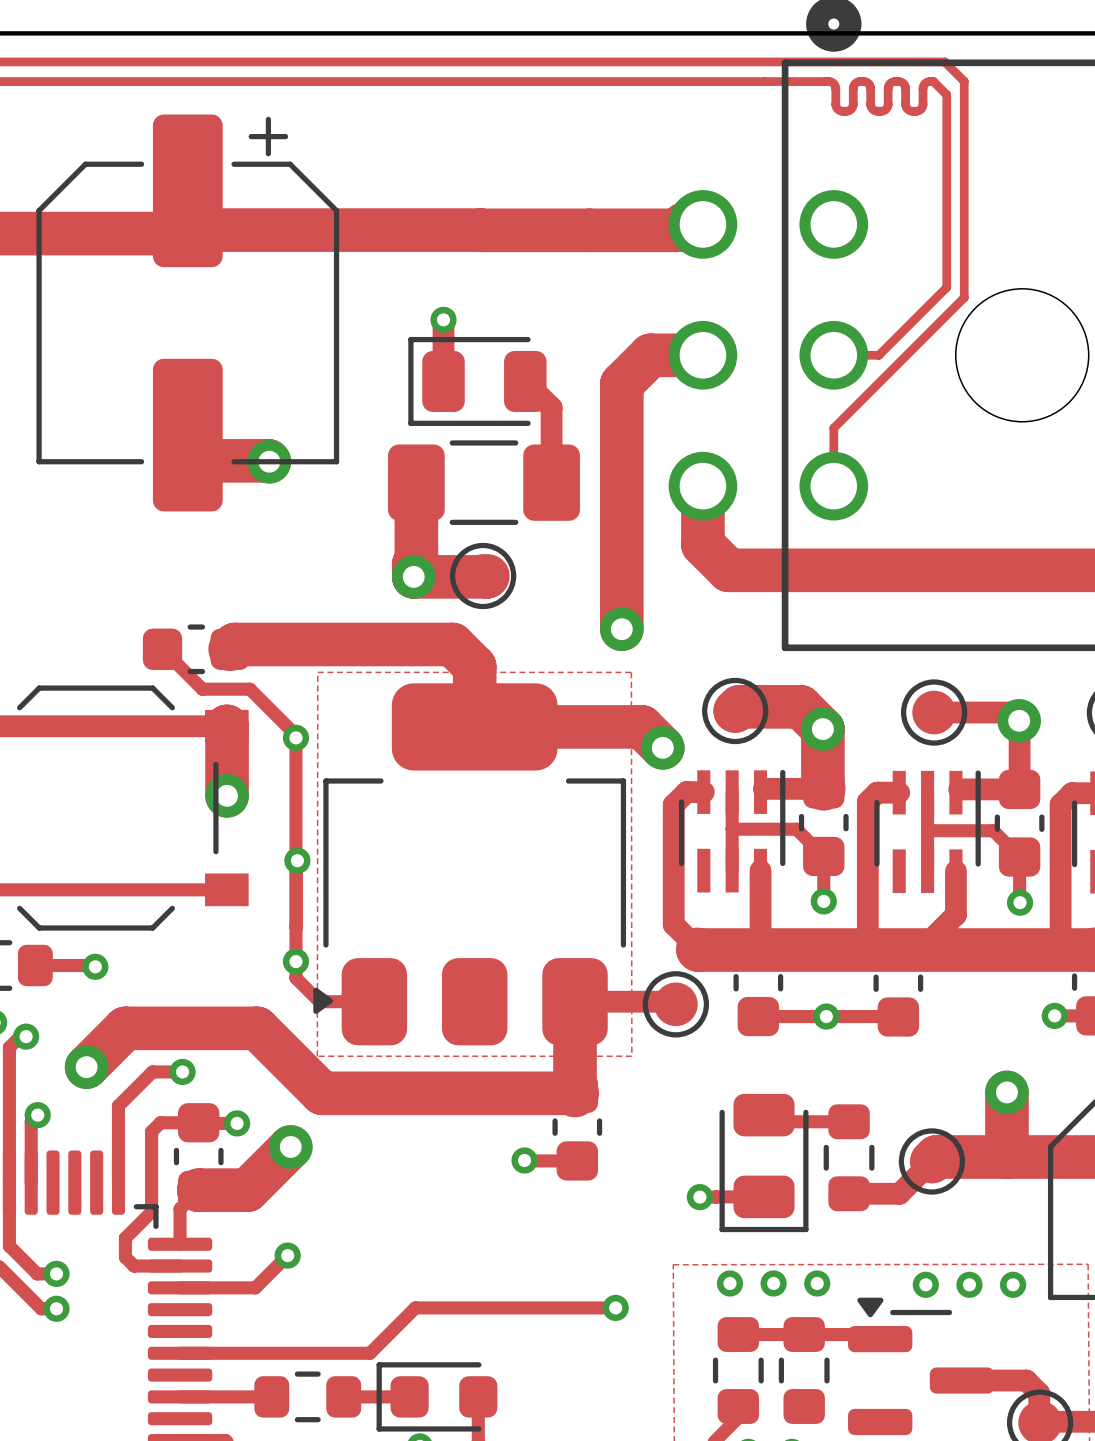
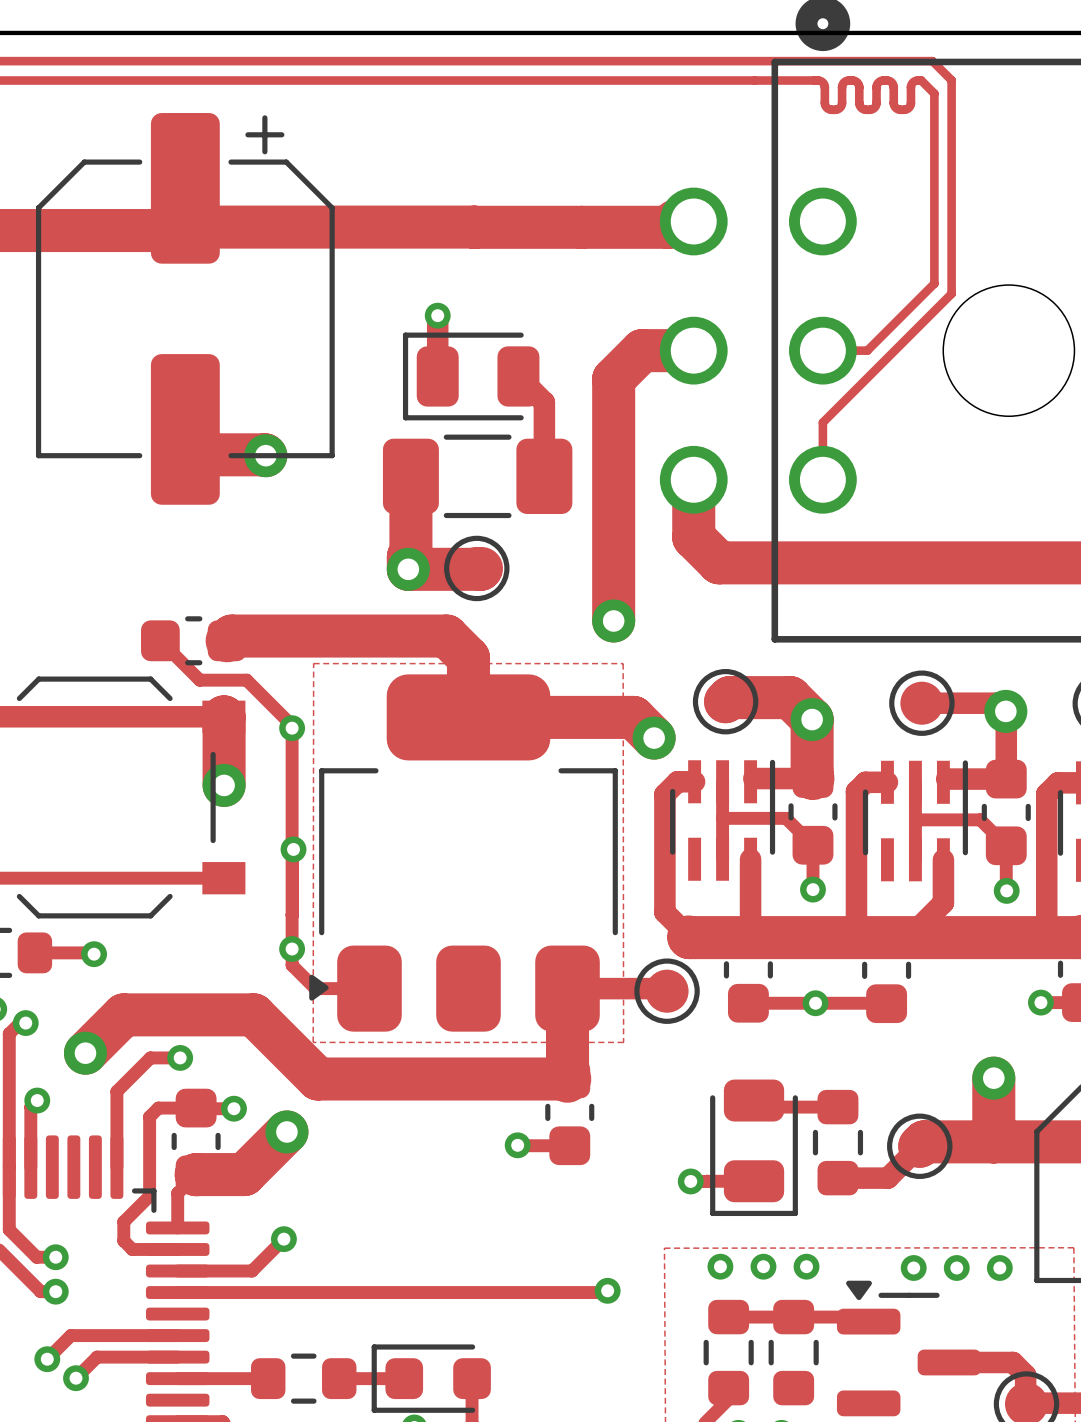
track: (615, 1307) (415, 1307) (370, 1353) (180, 1353) -> (607, 1290) (605, 1292) (177, 1292)
track: none -> (177, 1335) (70, 1335) (47, 1359)
track: none -> (177, 1357) (97, 1357) (76, 1378)
via: none -> (47, 1359)
via: none -> (76, 1378)

